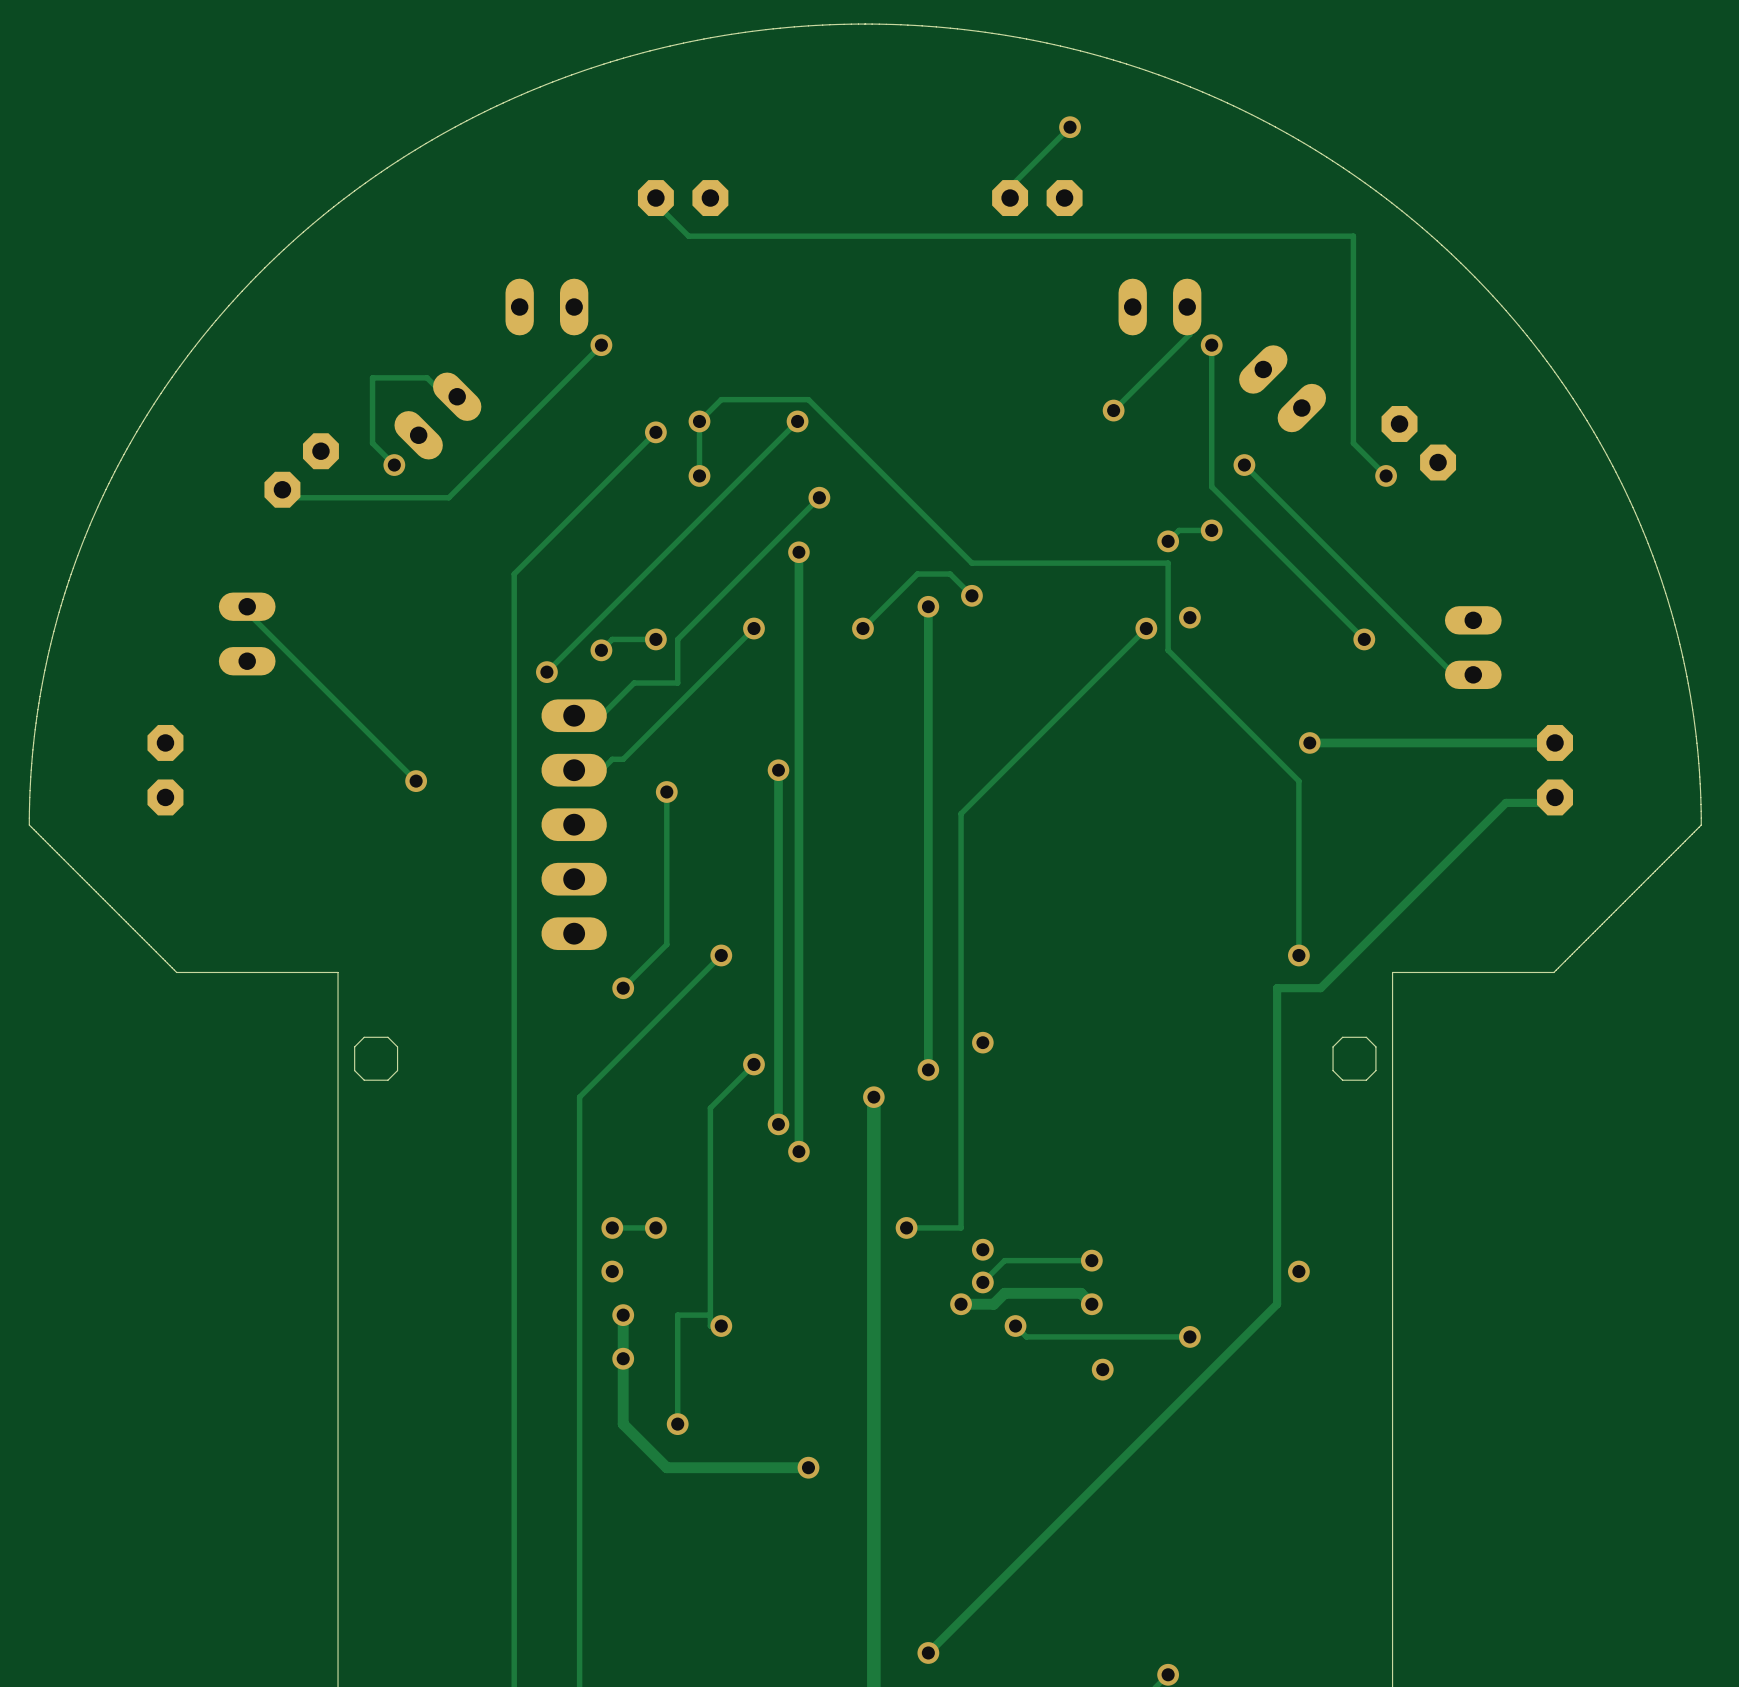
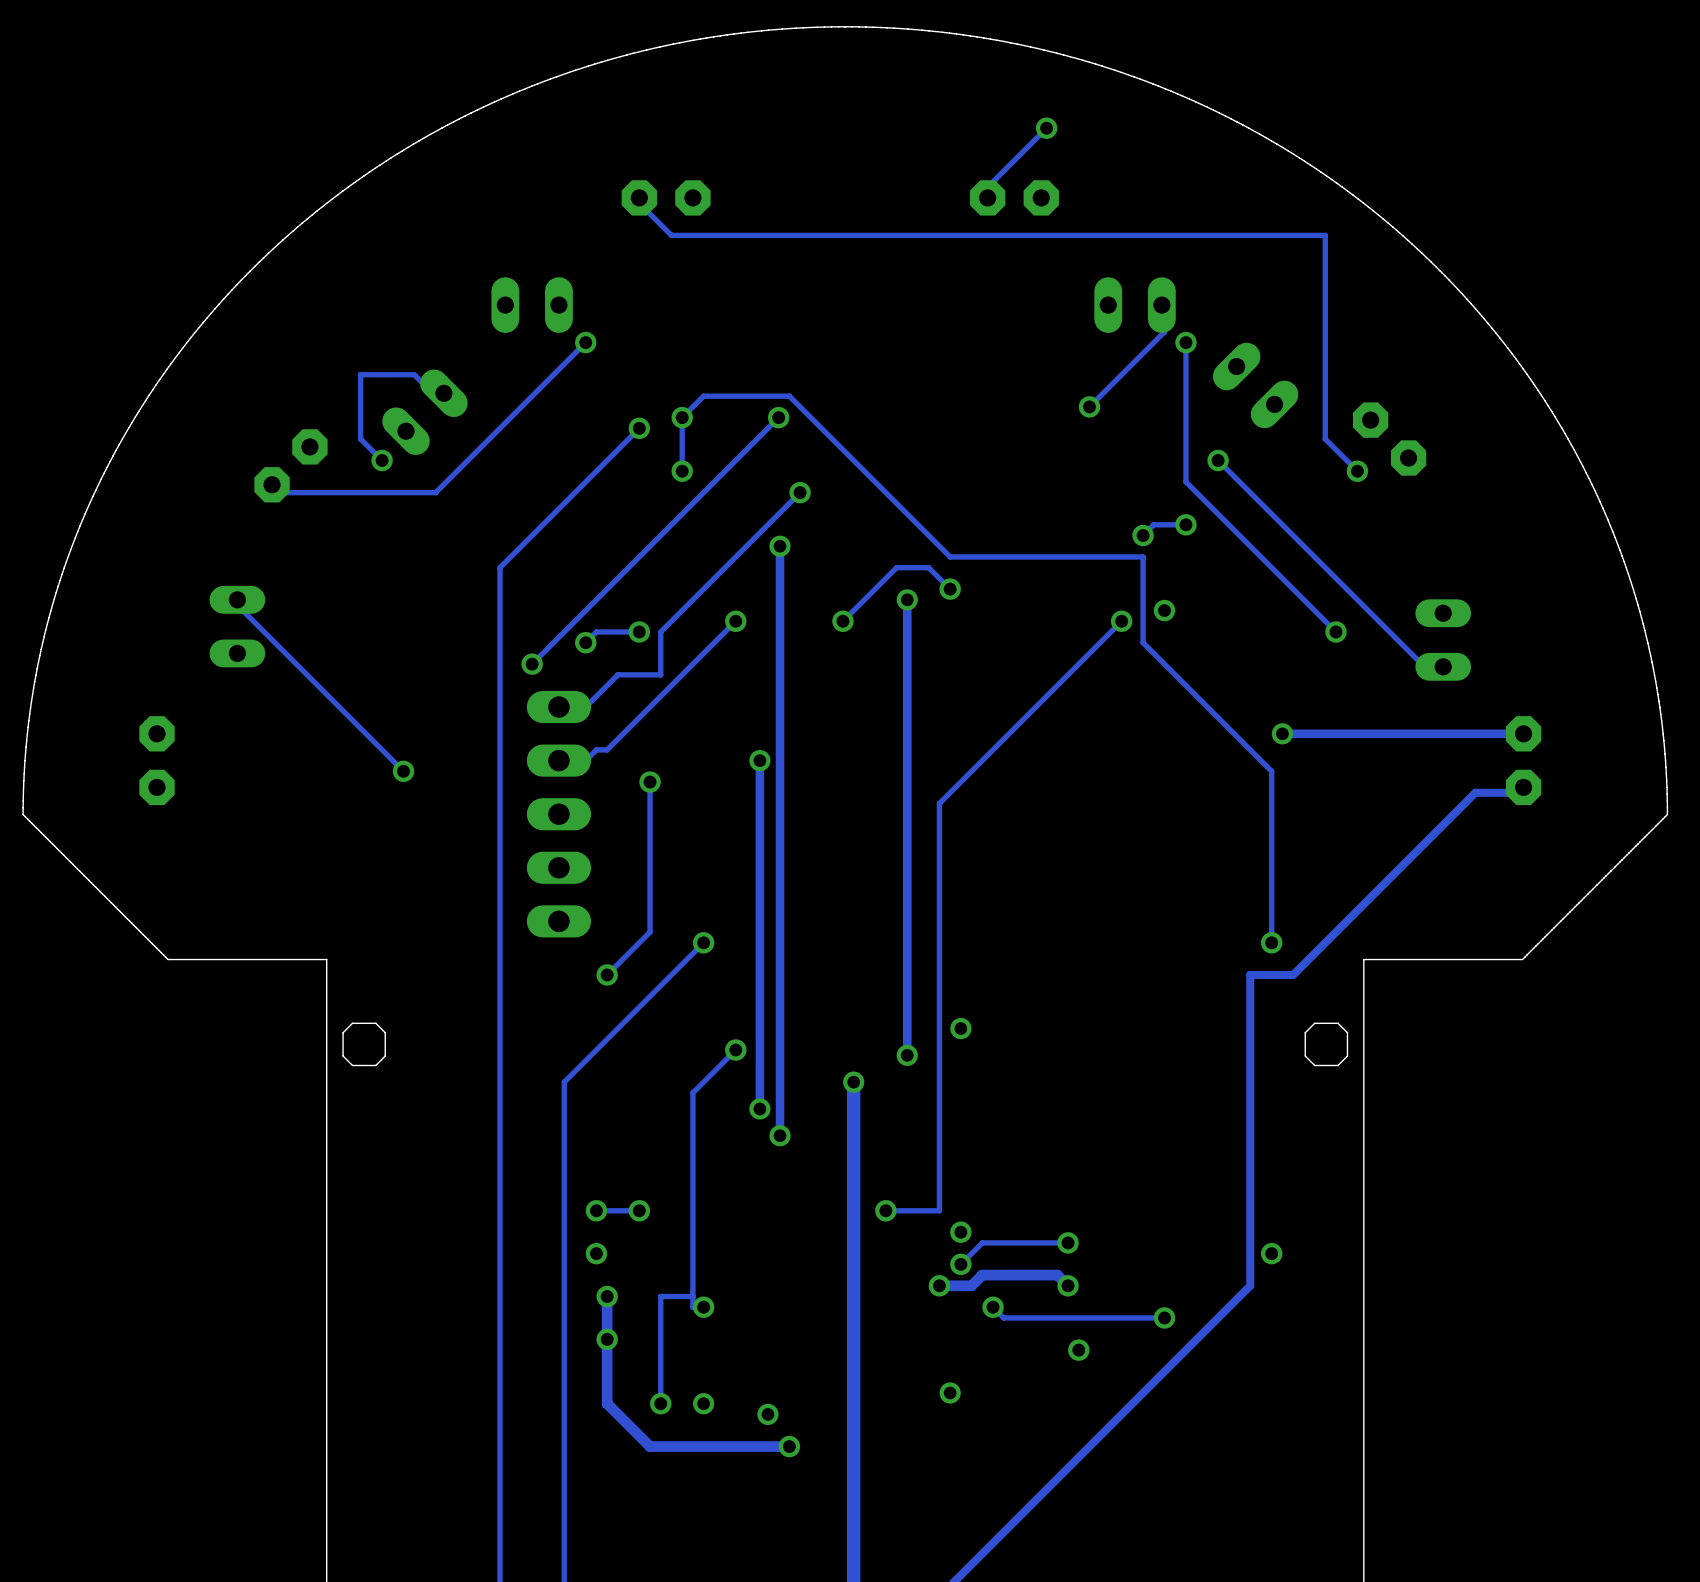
via: none -> (950, 1392)
via: none -> (703, 1403)
via: none -> (767, 1414)

